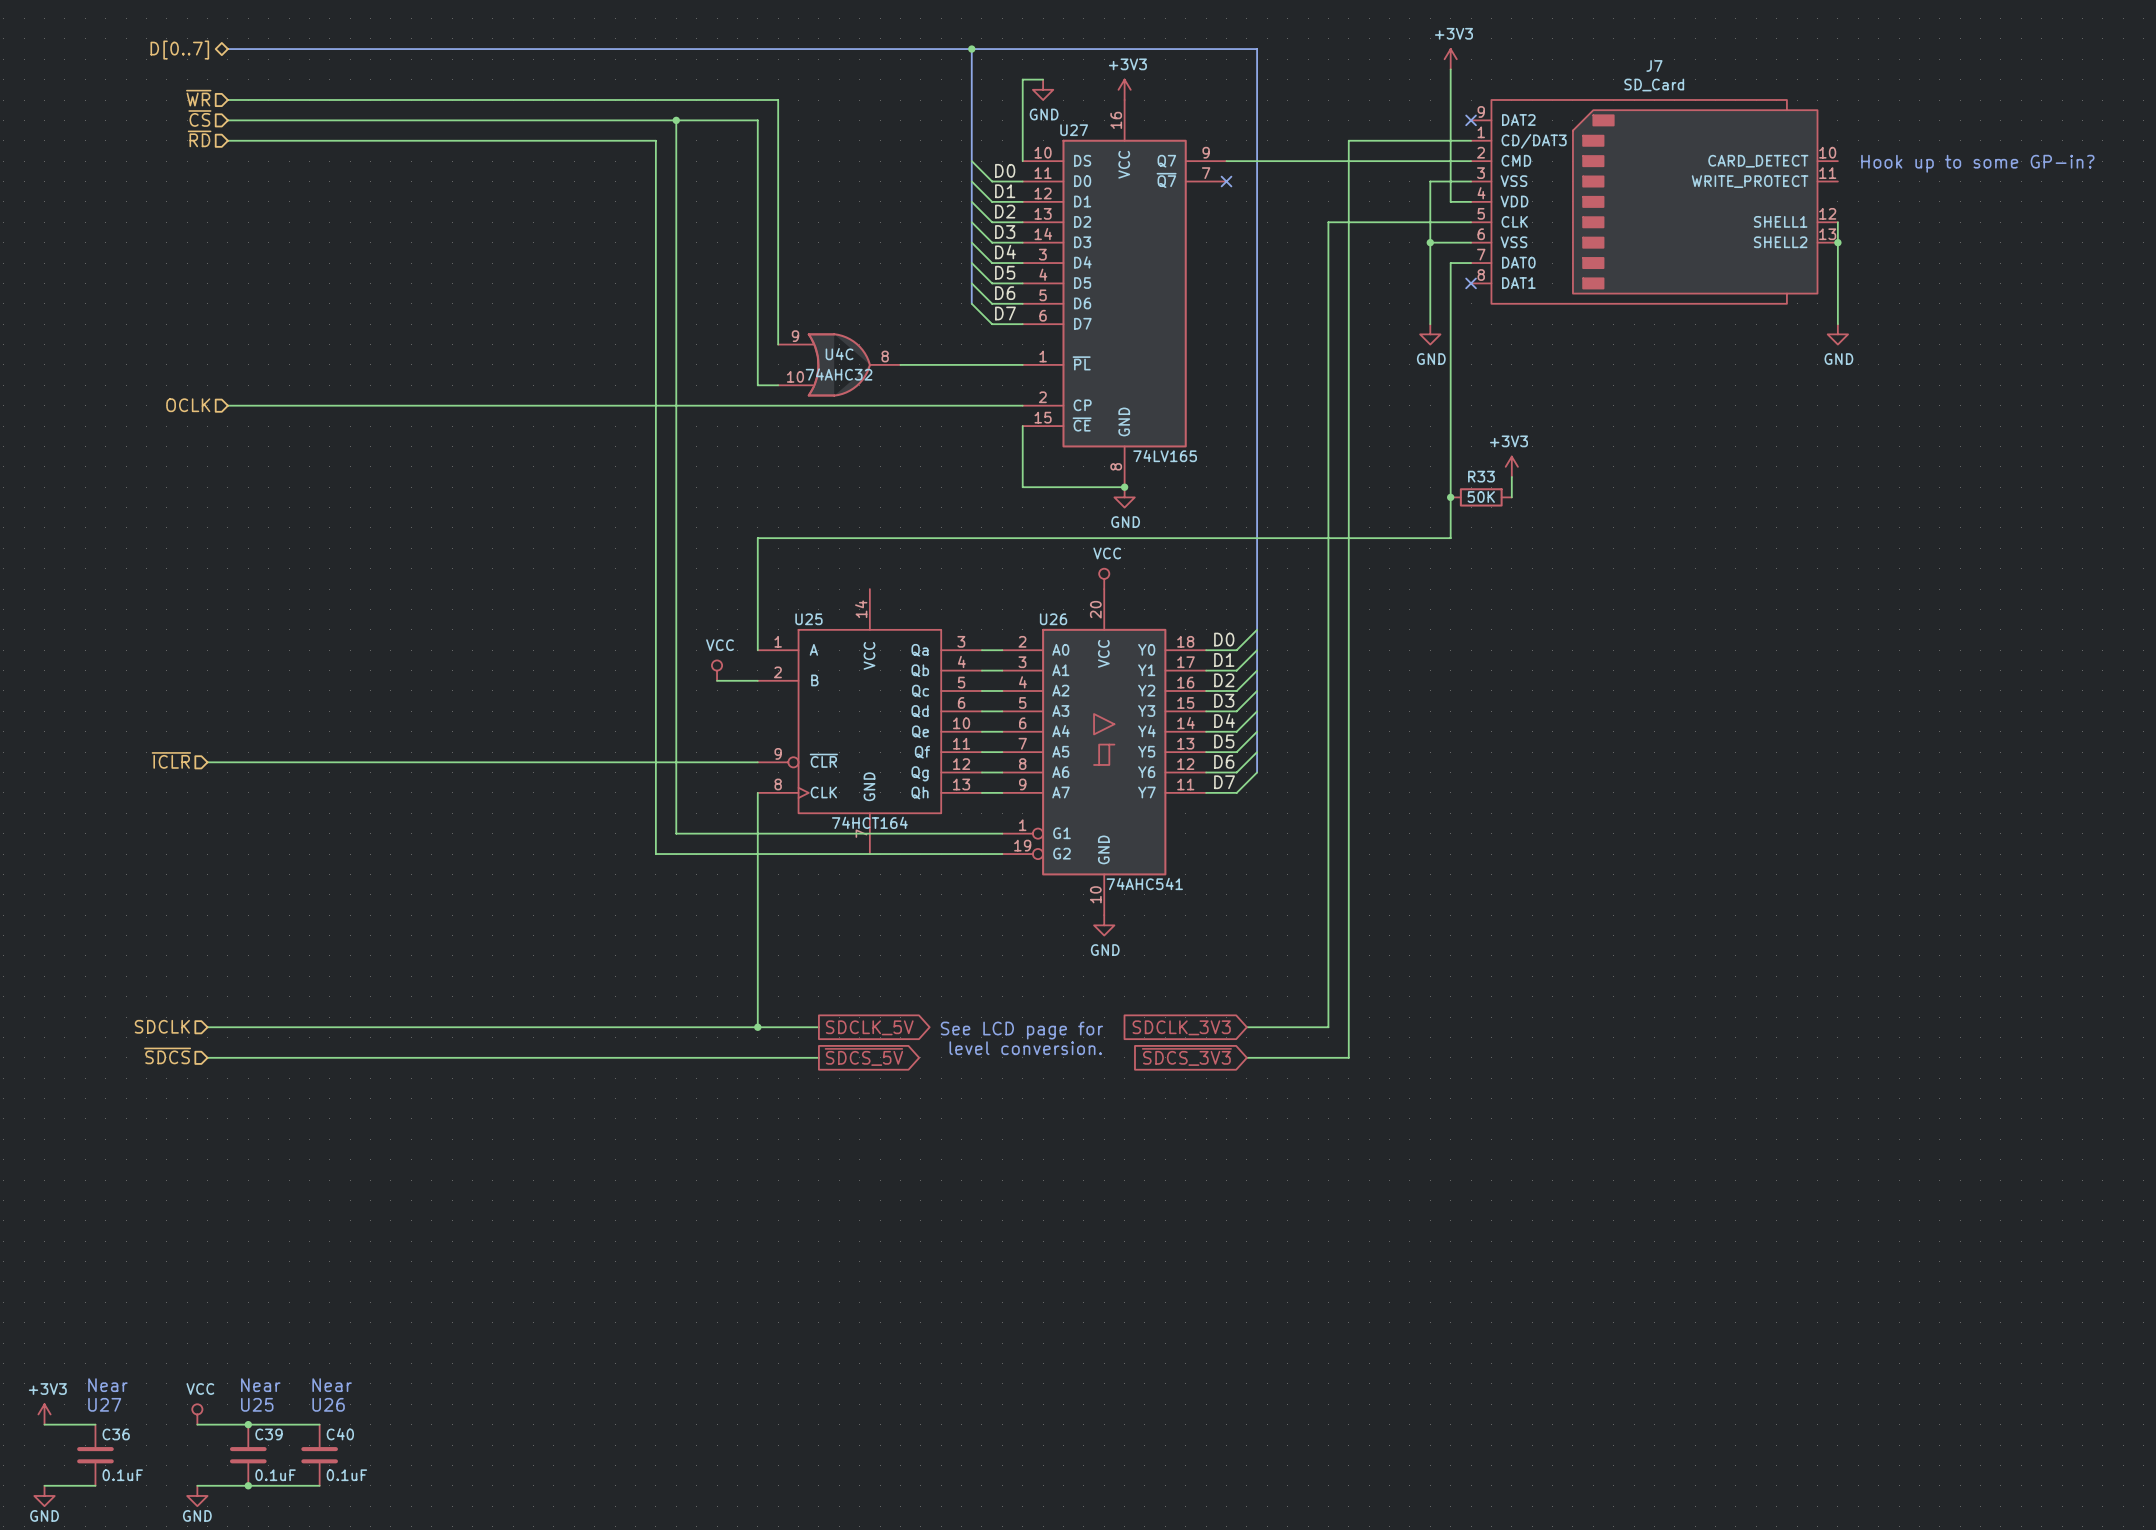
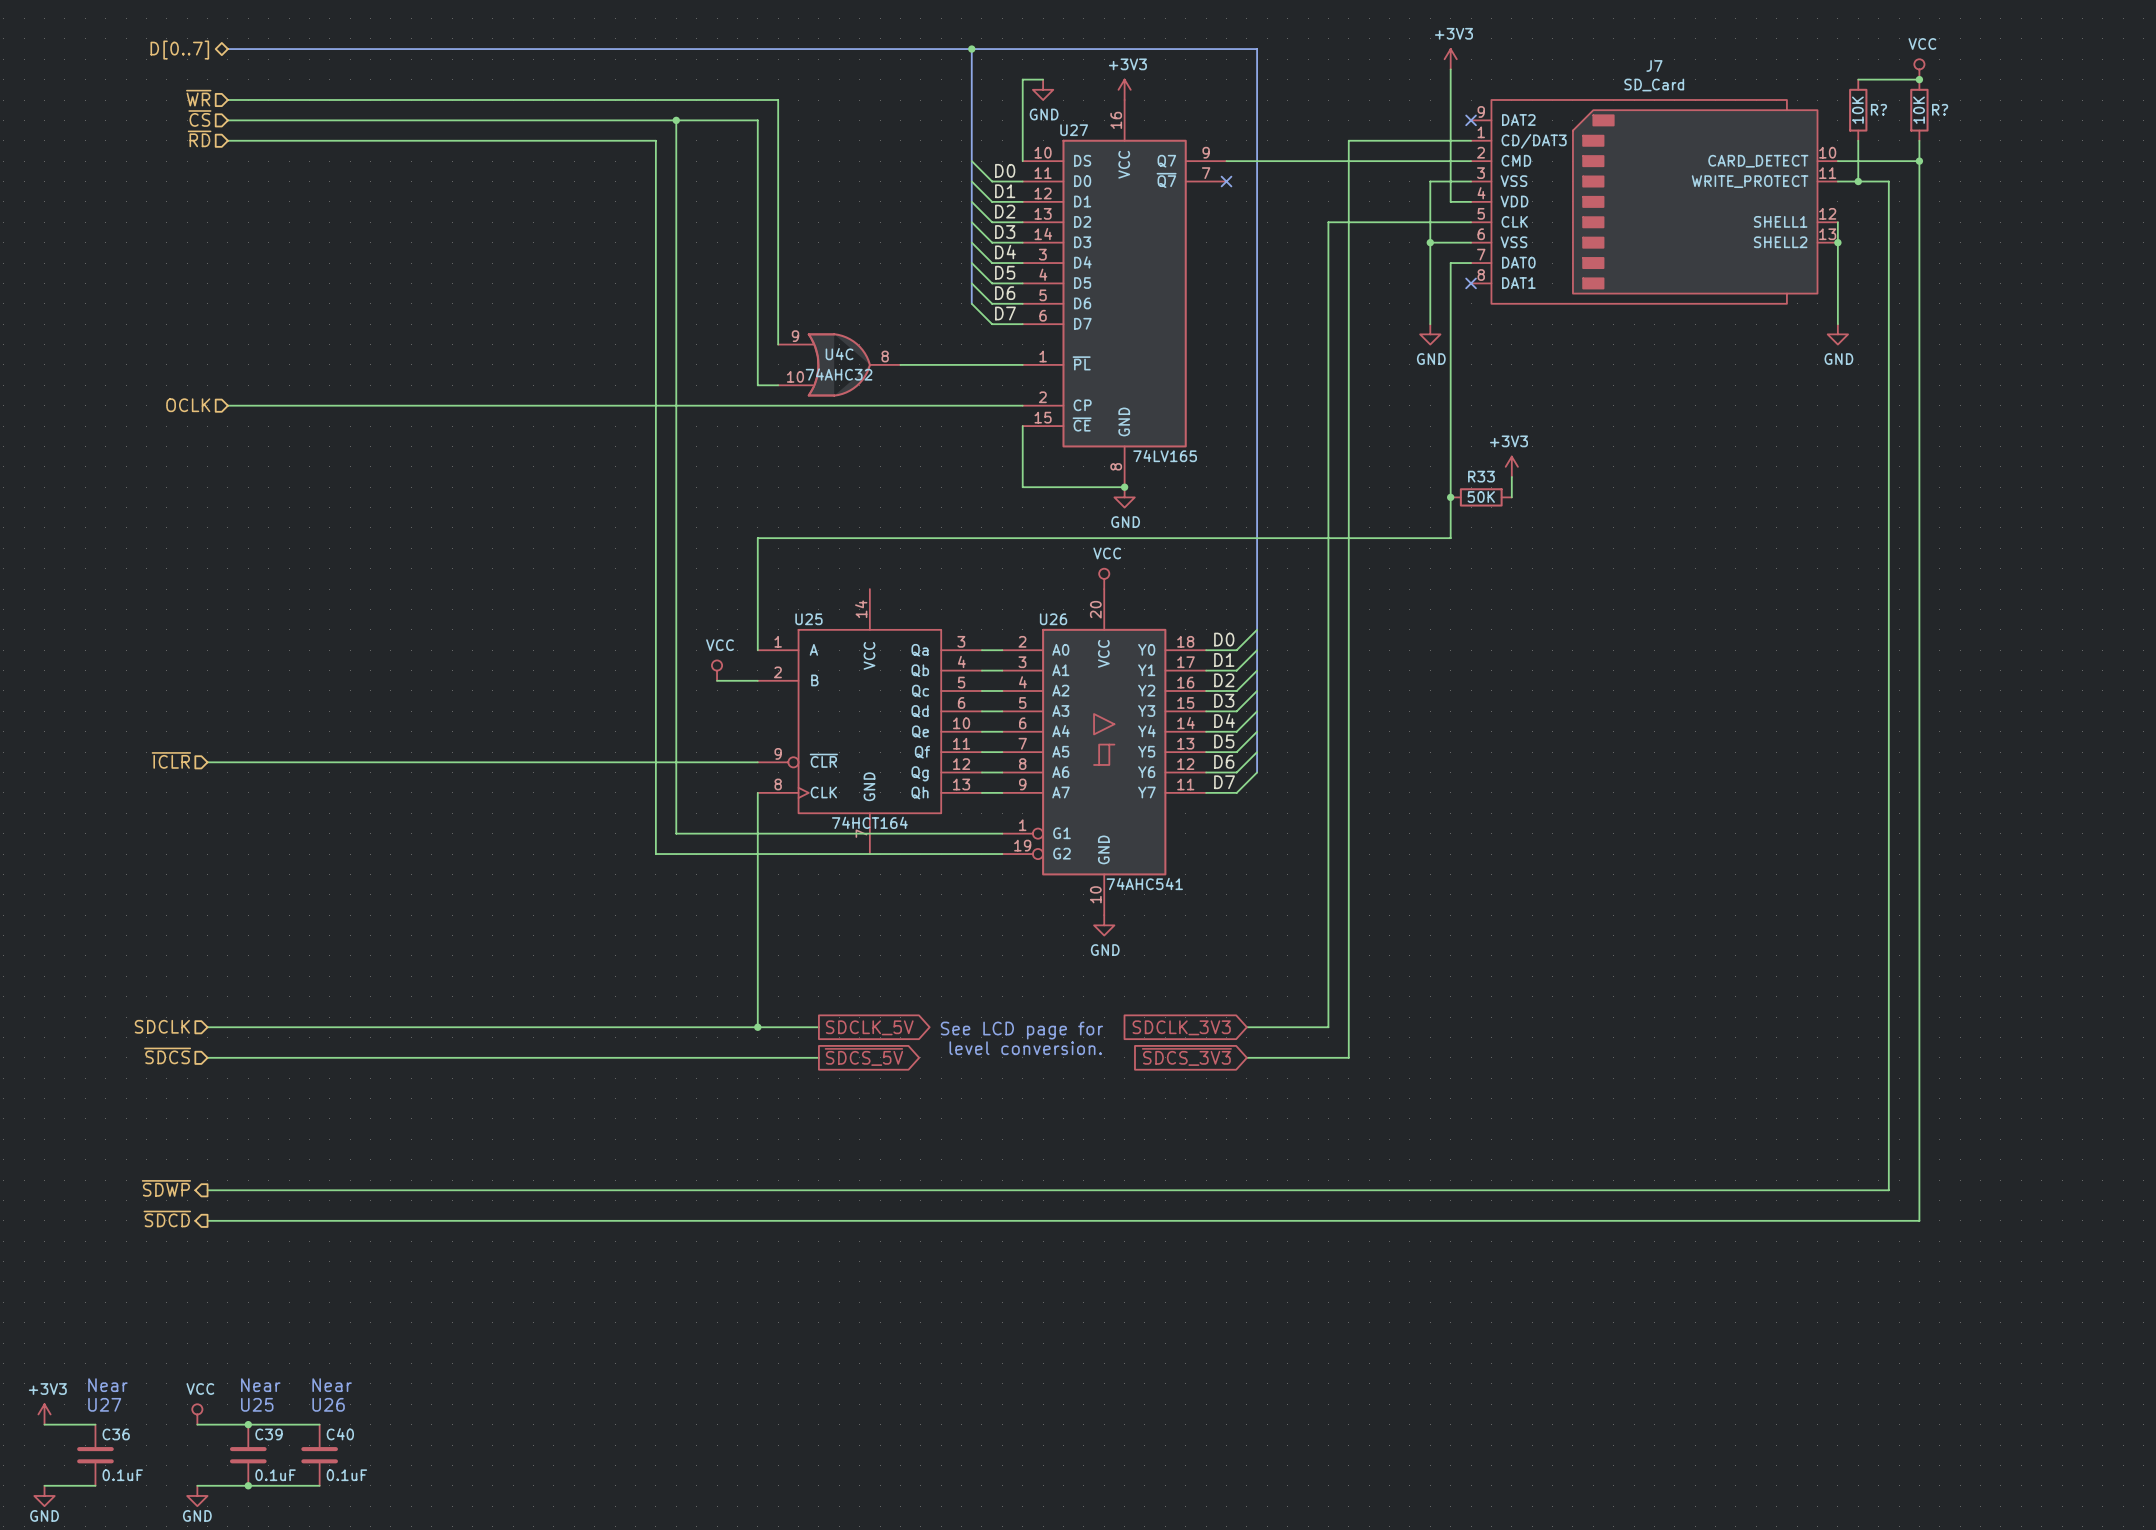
power symbol: none -> VCC (1919, 69)
wire: none -> (1858, 79) (1919, 79)
junction: none -> (1919, 79)
R?: none -> 10K (1858, 110)
R?: none -> 10K (1919, 110)
wire: none -> (1858, 140) (1858, 181)
wire: none -> (1919, 140) (1919, 1220) (207, 1220)
wire: none -> (1837, 161) (1919, 161)
junction: none -> (1919, 161)
text: Hook up to some GP-in? (1977, 163) -> none
wire: none -> (1837, 181) (1888, 181) (1888, 1190) (207, 1190)
junction: none -> (1858, 181)
hierarchical label: none -> ~{SDWP} (166, 1188)
hierarchical label: none -> ~{SDCD} (167, 1218)

